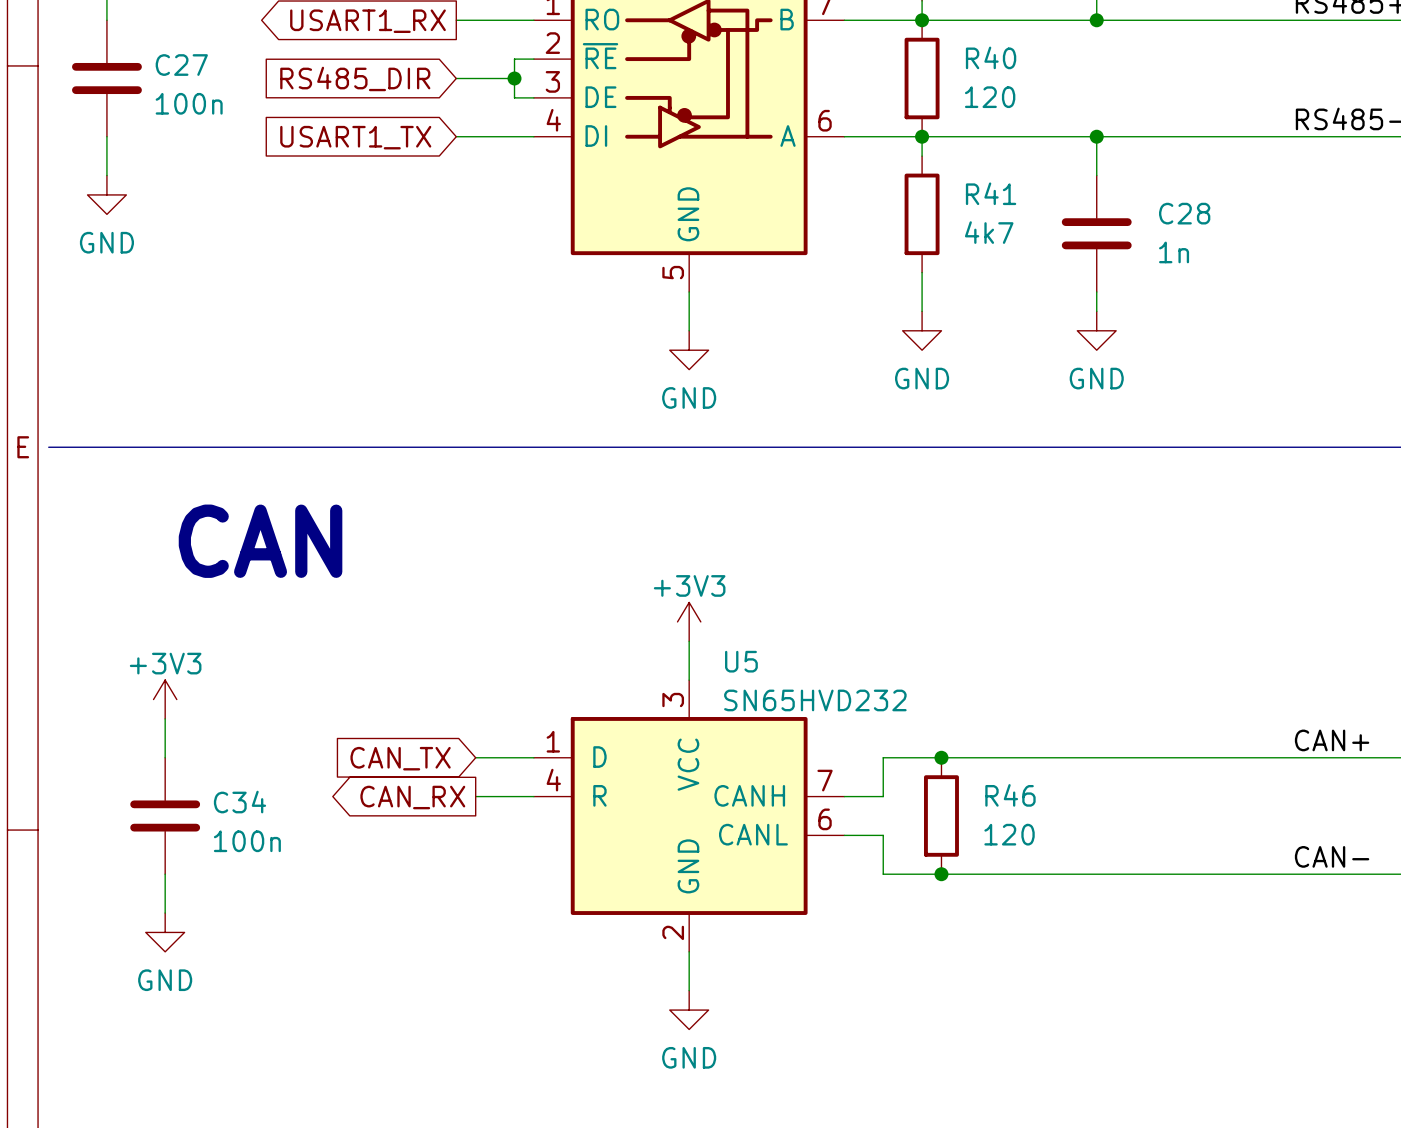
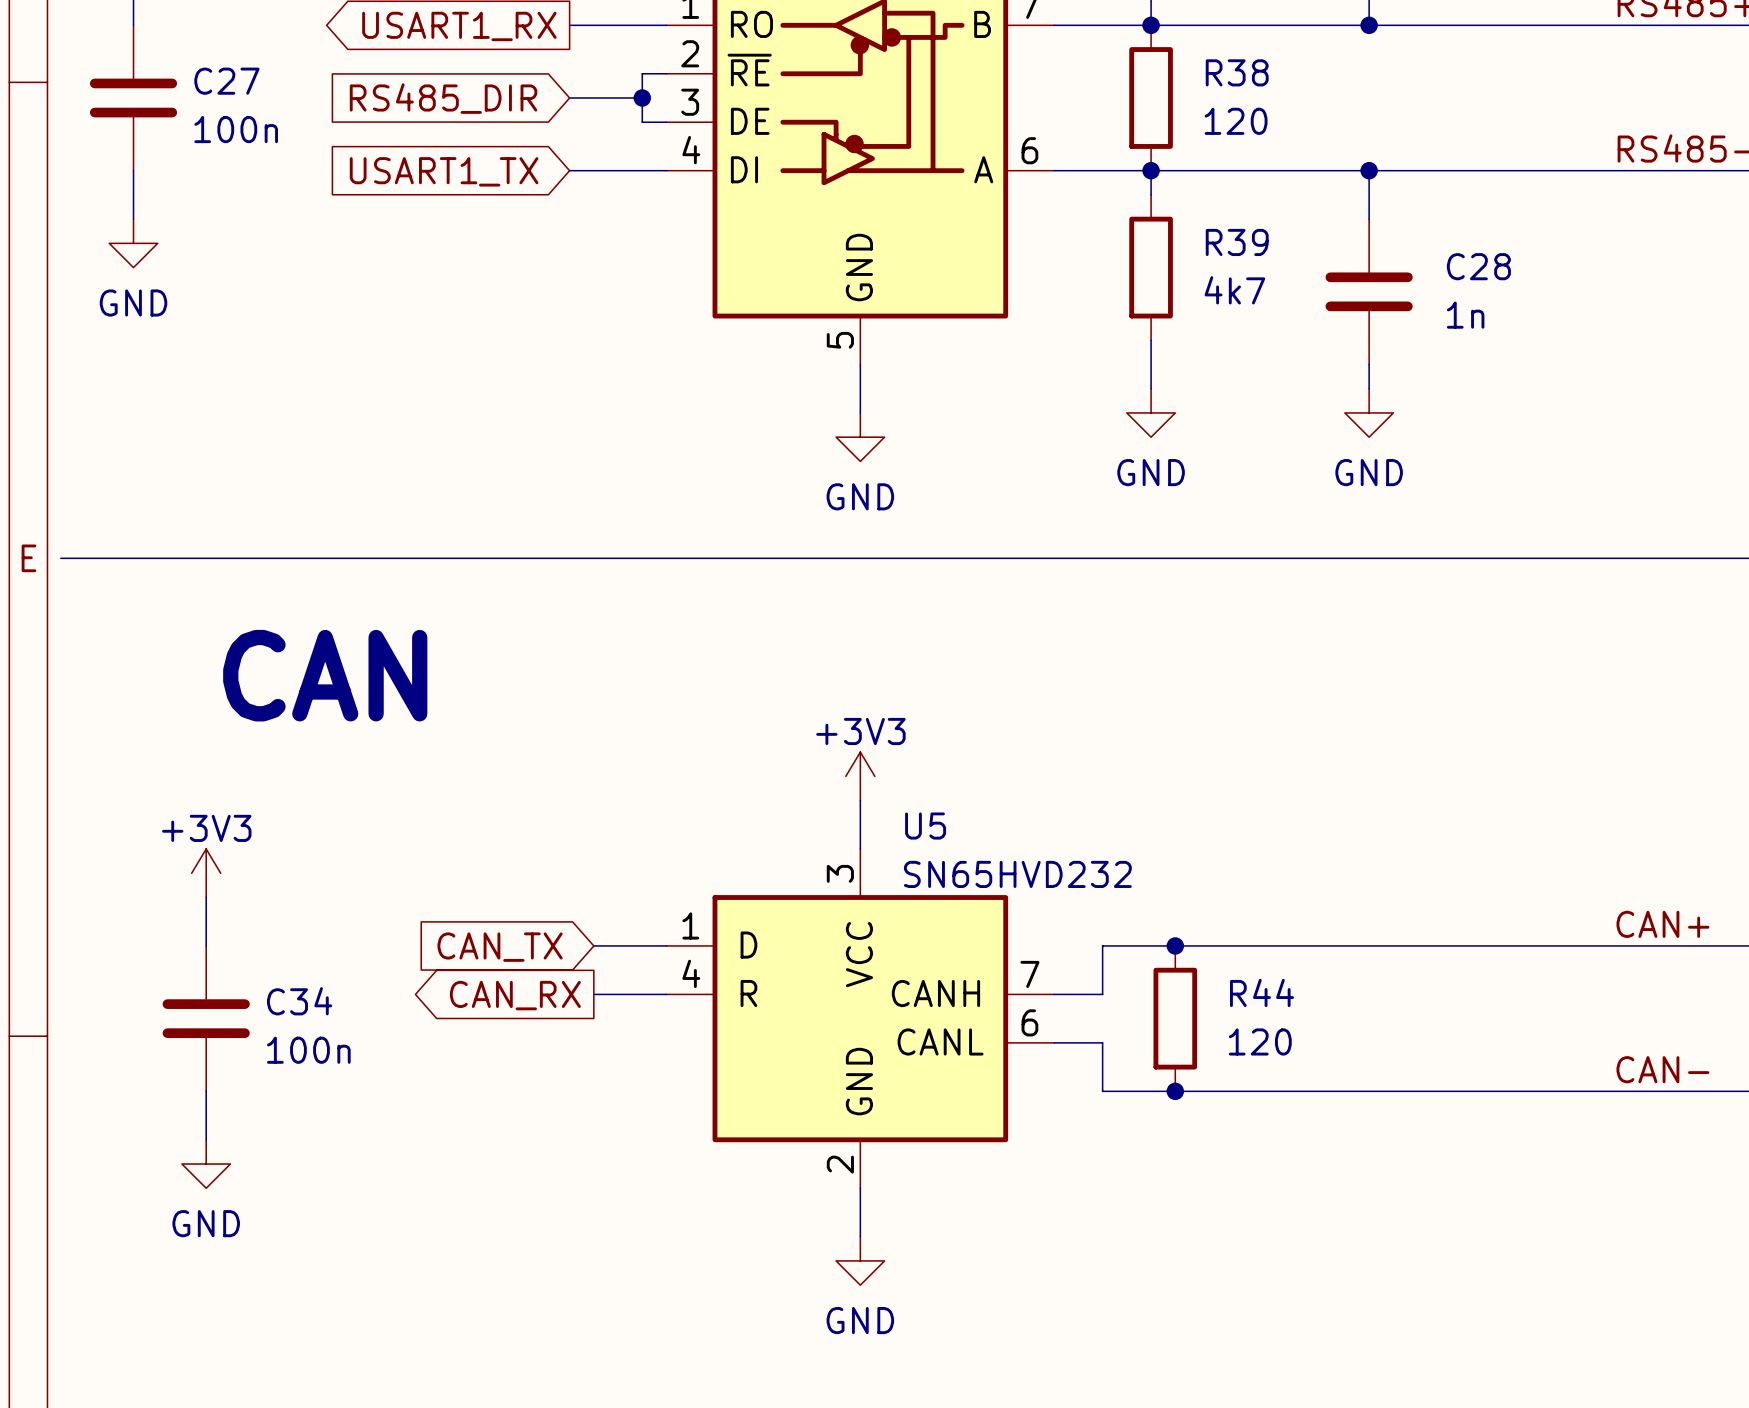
R40 name: R40 (991, 57) -> R38 (1237, 72)
R41 name: R41 (991, 193) -> R39 (1237, 242)
R46 name: R46 (1010, 795) -> R44 (1262, 992)

